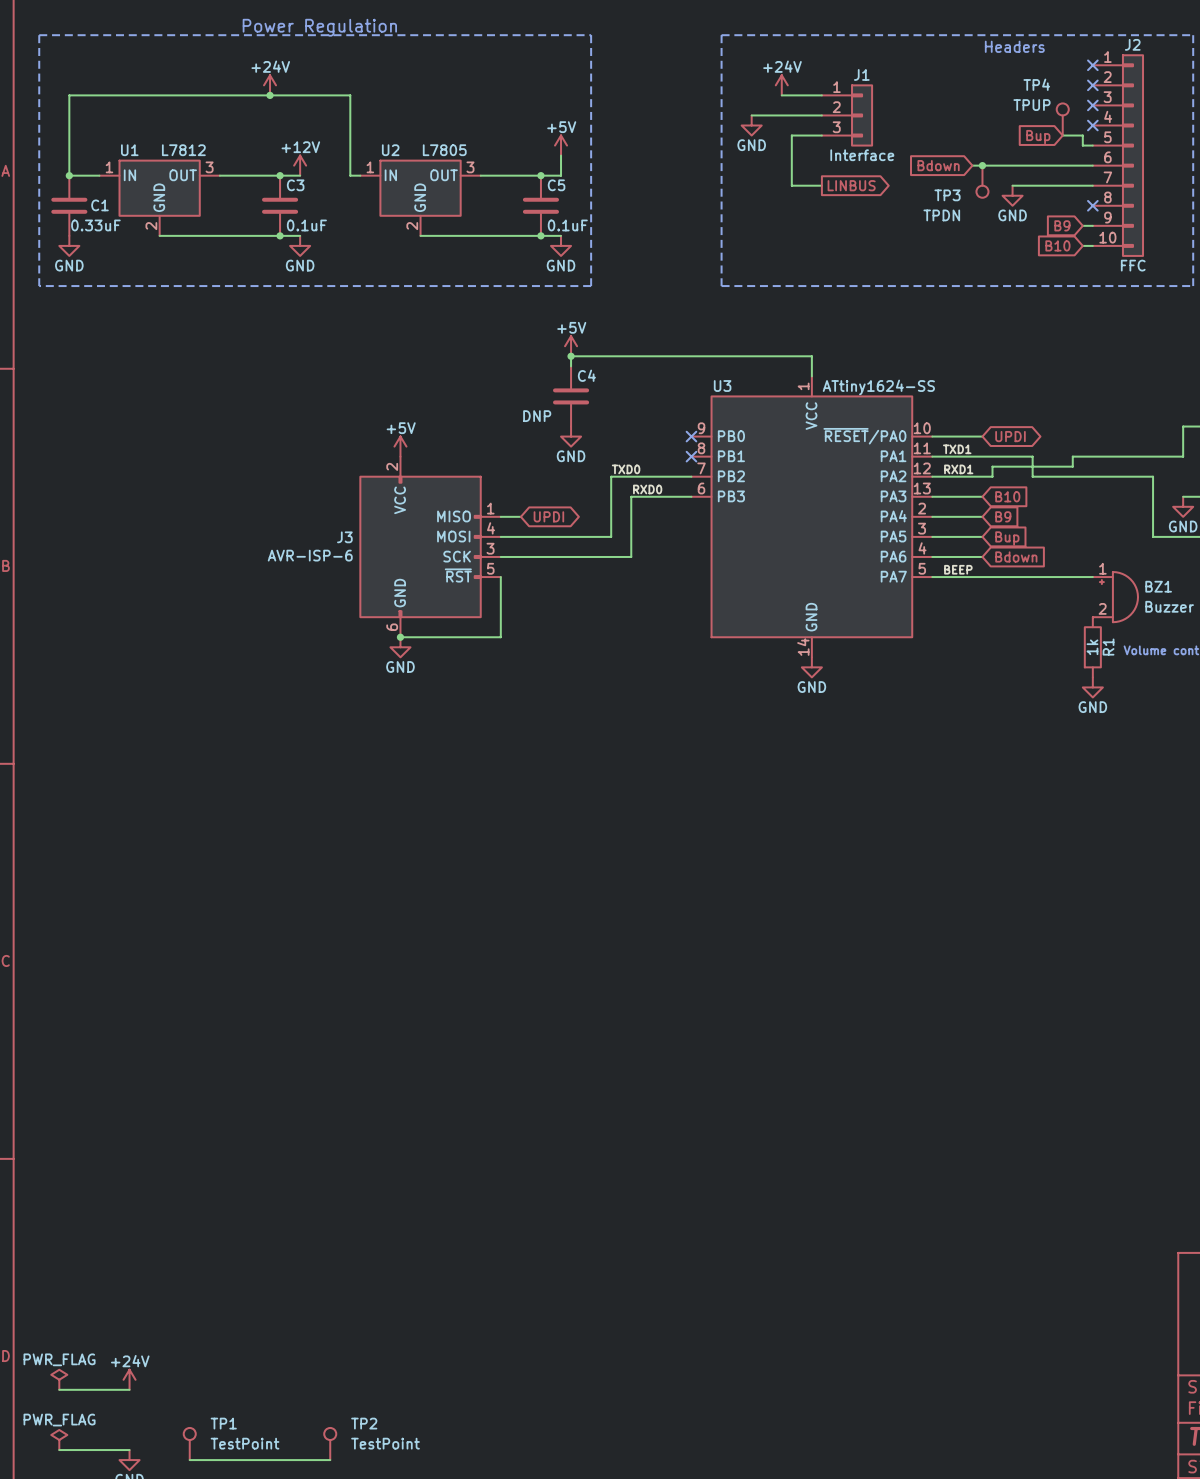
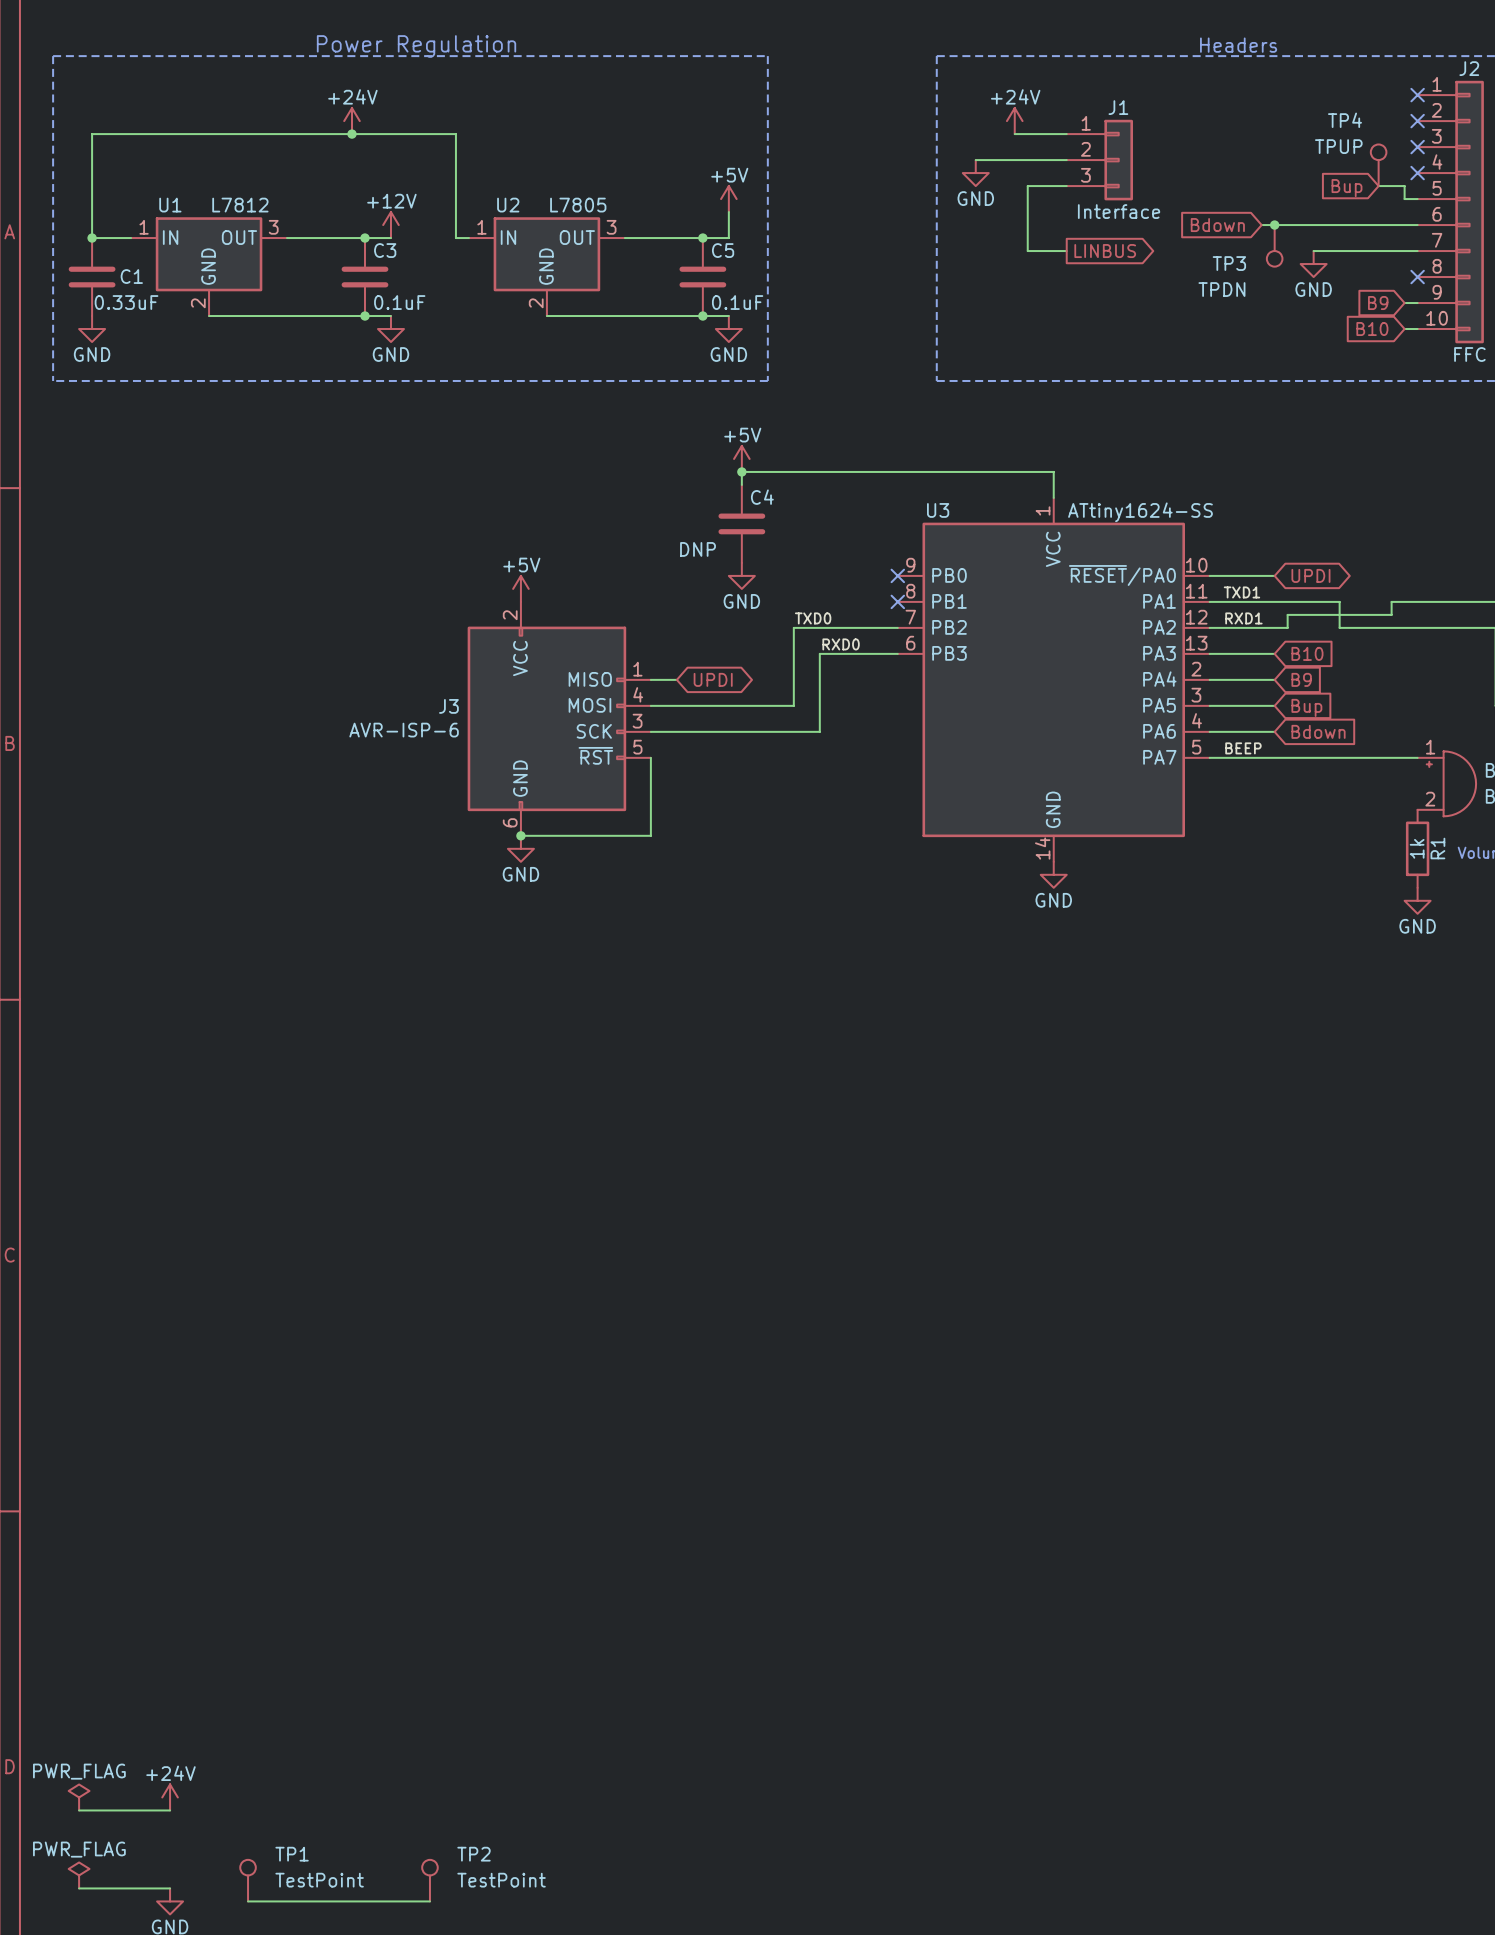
text position: Headers (1014, 46) -> Headers (1238, 45)

